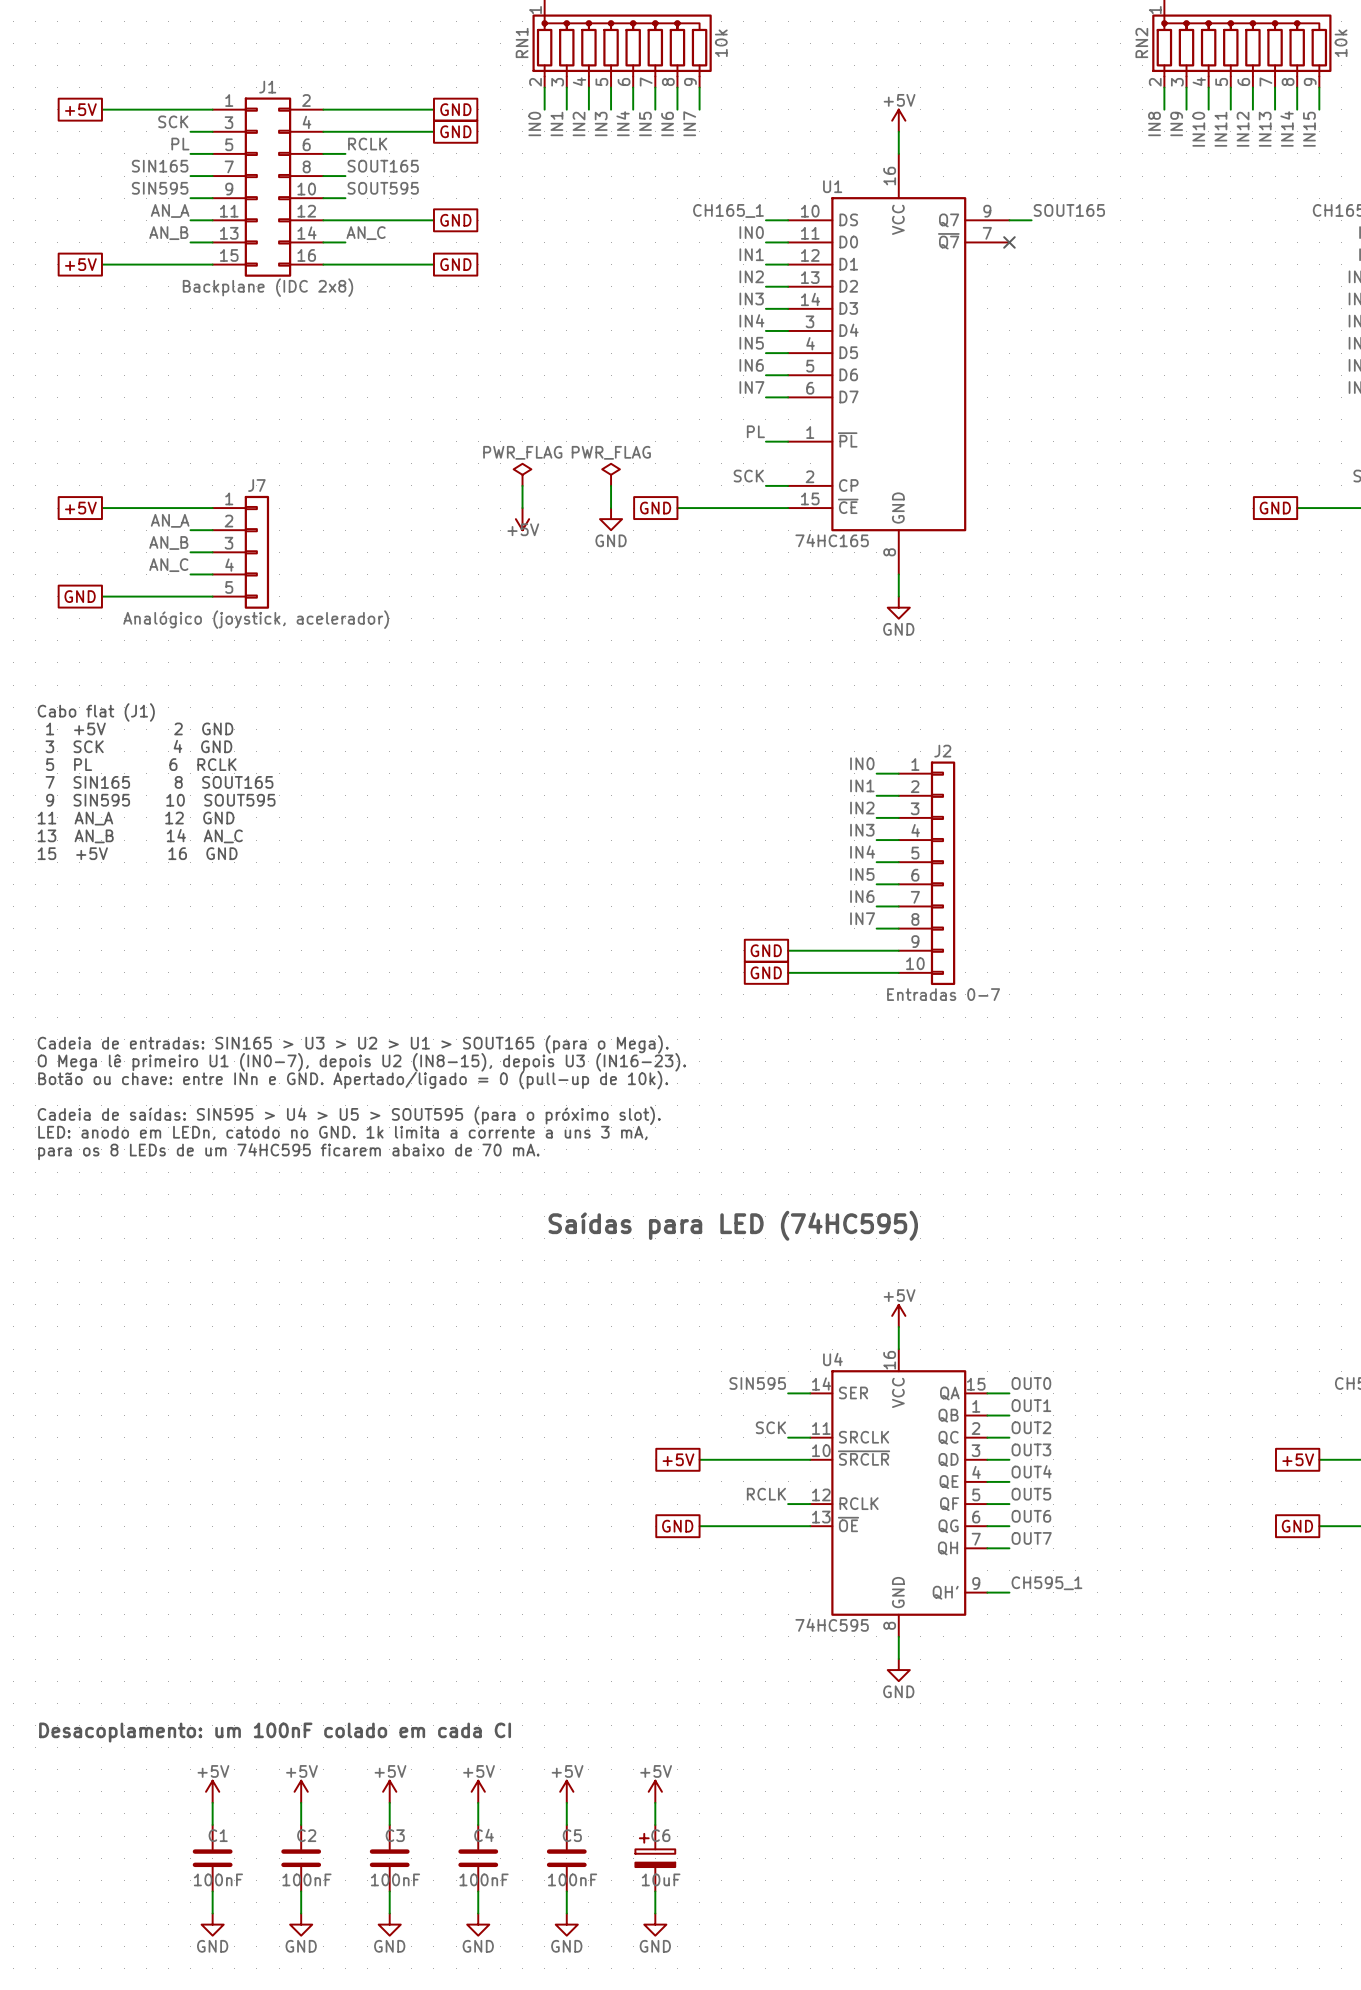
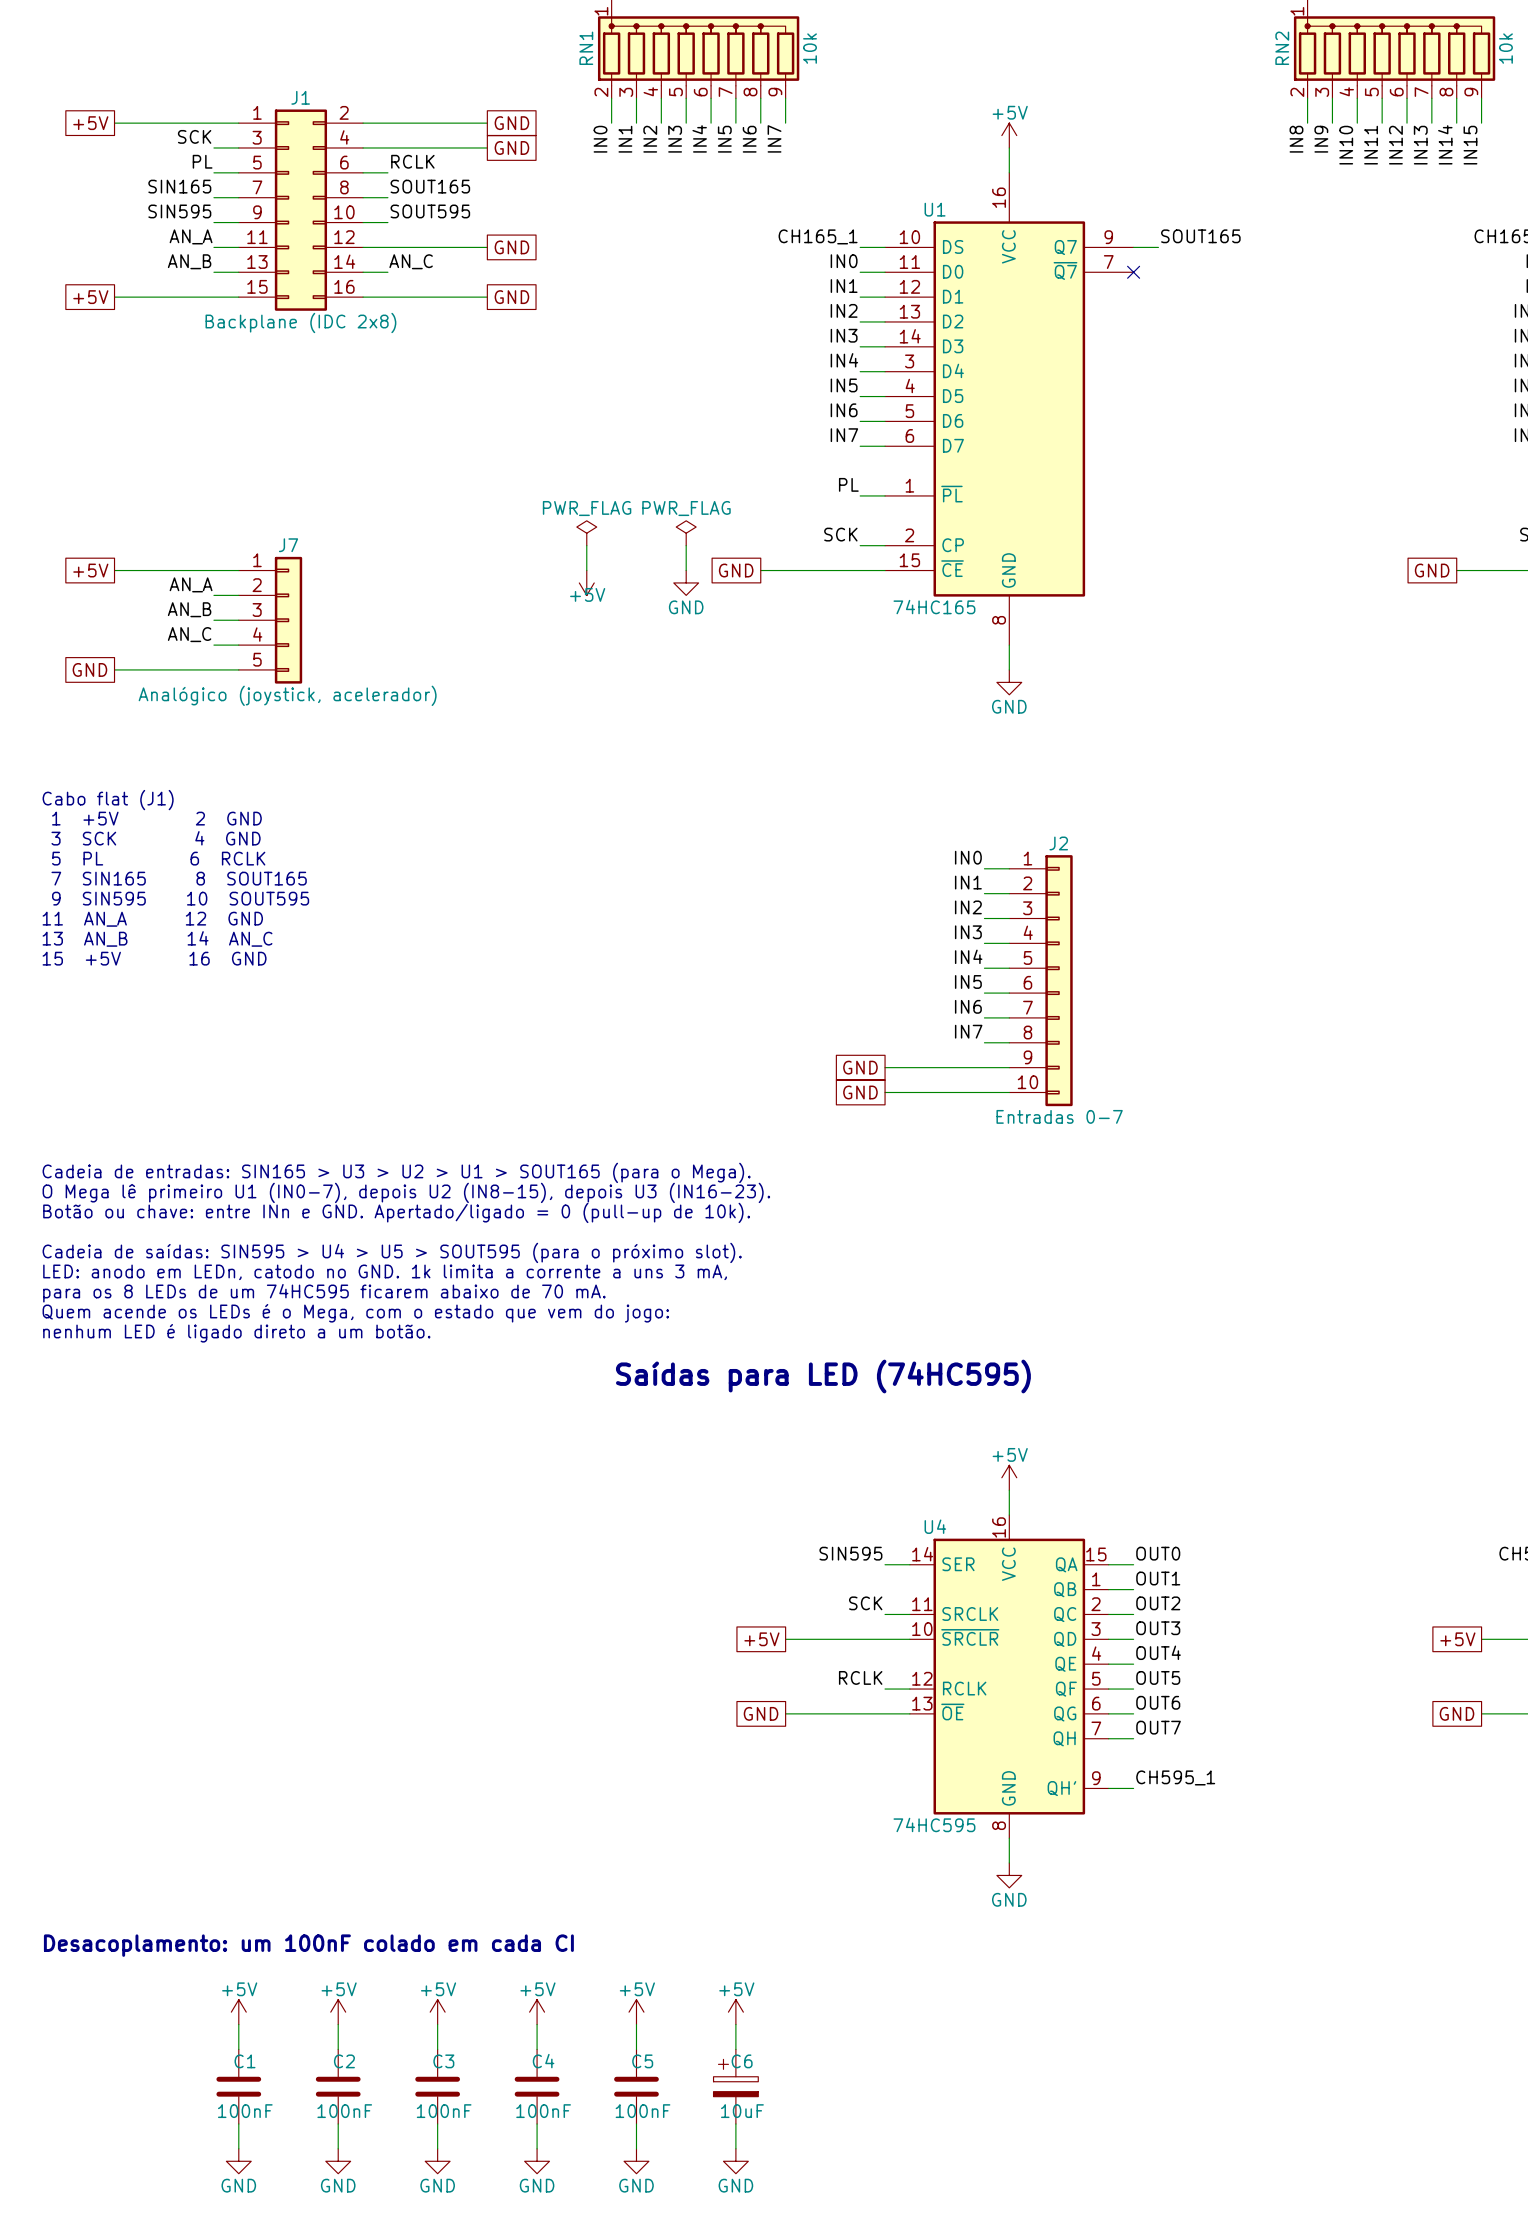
text: none -> Quem acende os LEDs é o Mega, com o estado que vem do jogo: (355, 1313)
text: none -> nenhum LED é ligado direto a um botão. (236, 1333)

